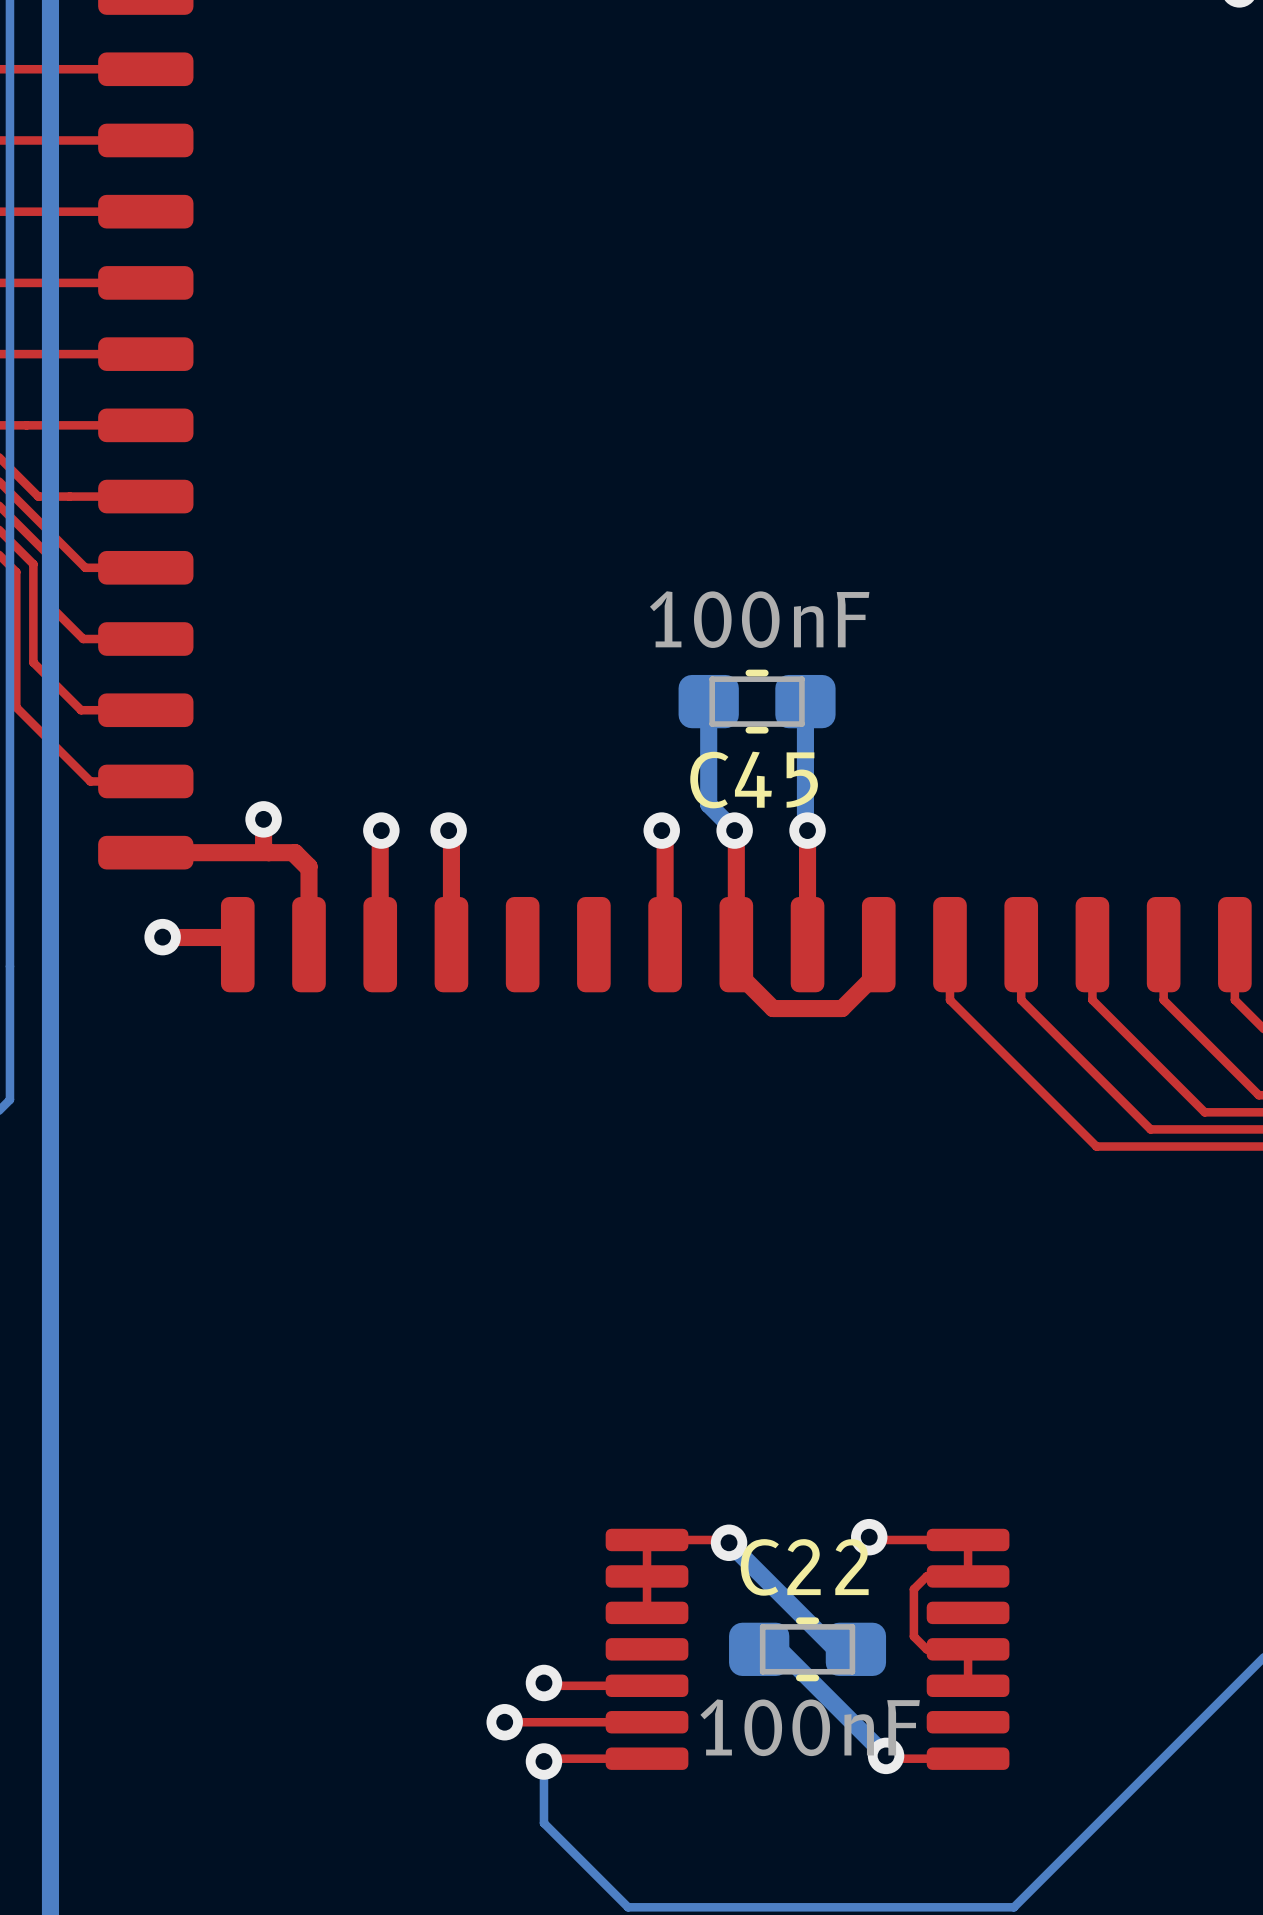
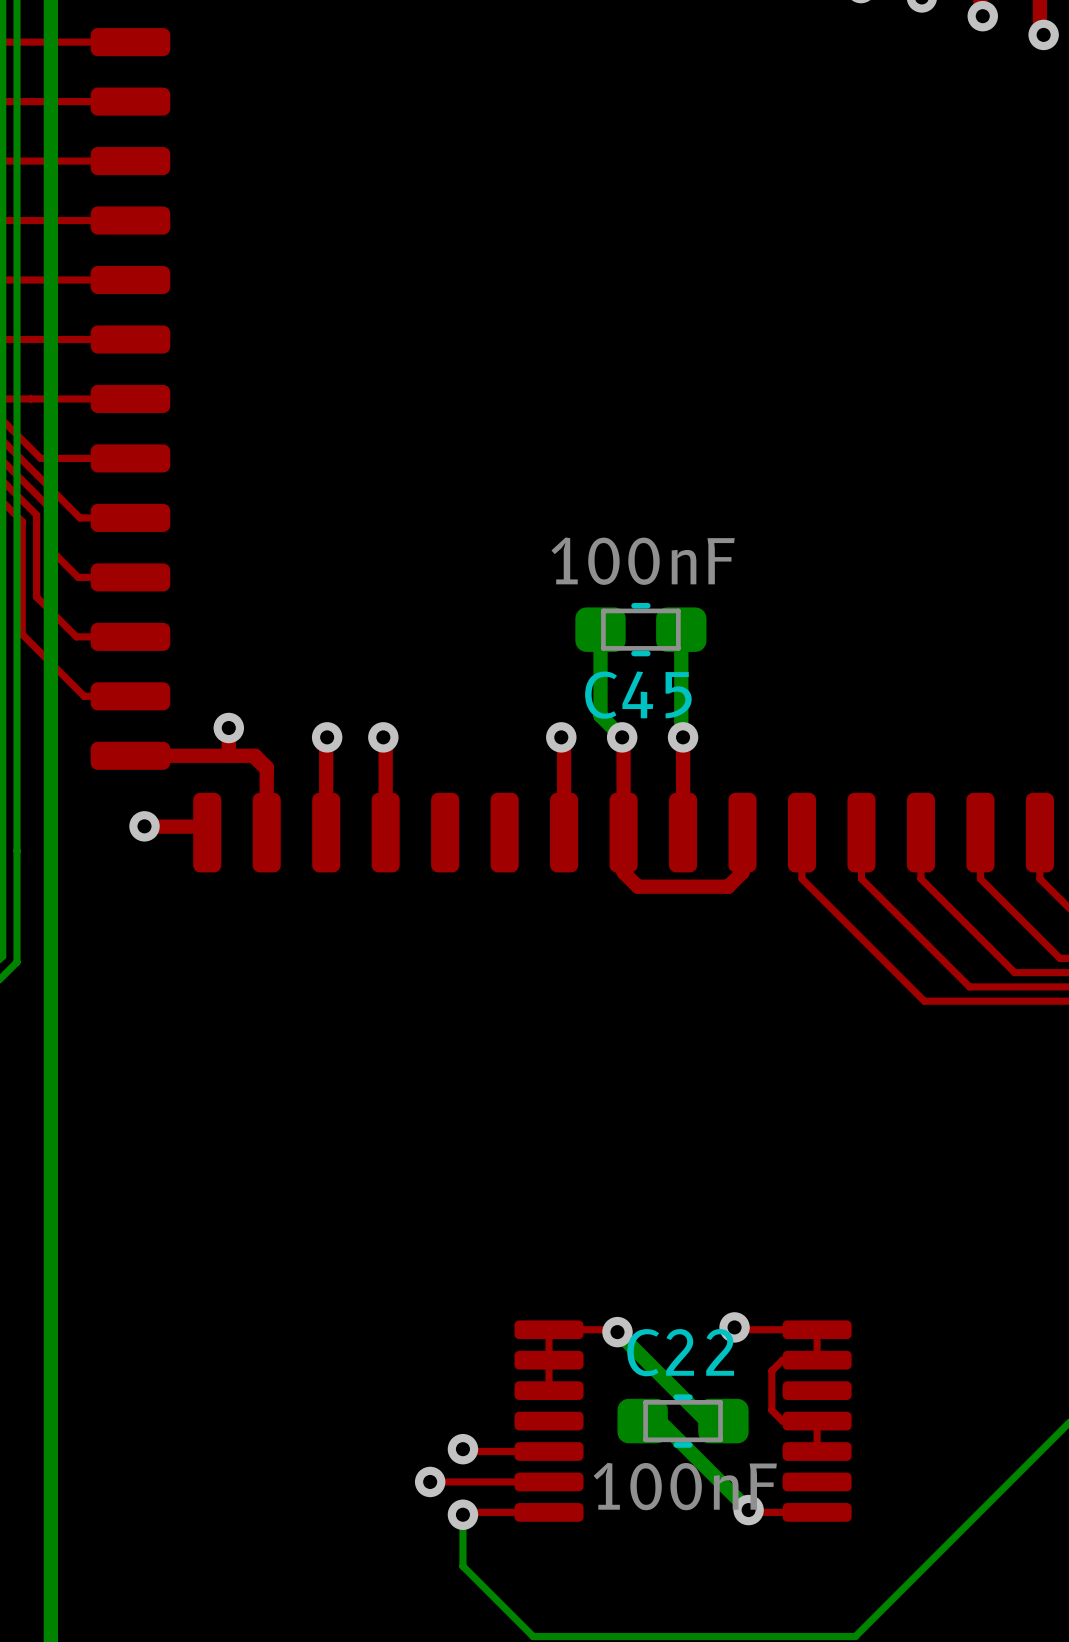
top track: (878, 971) (842, 1008) (773, 1008) (736, 971) -> (742, 855) (742, 872) (728, 886) (637, 886) (623, 872) (623, 855)

